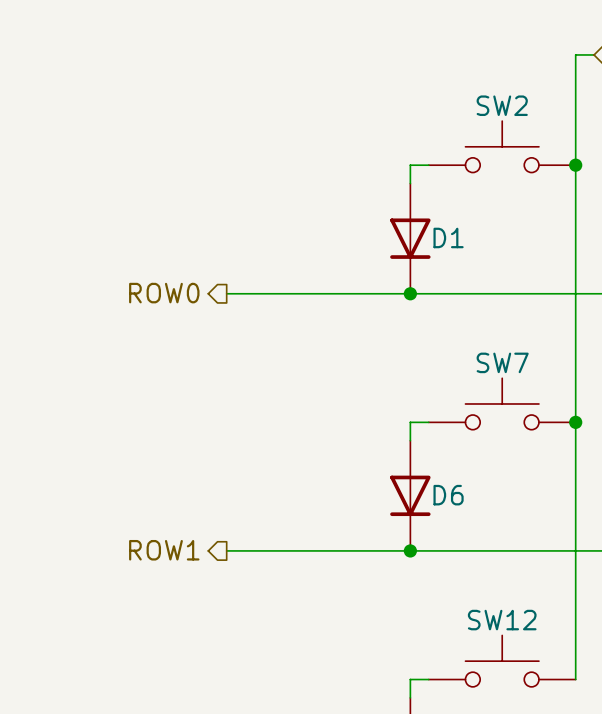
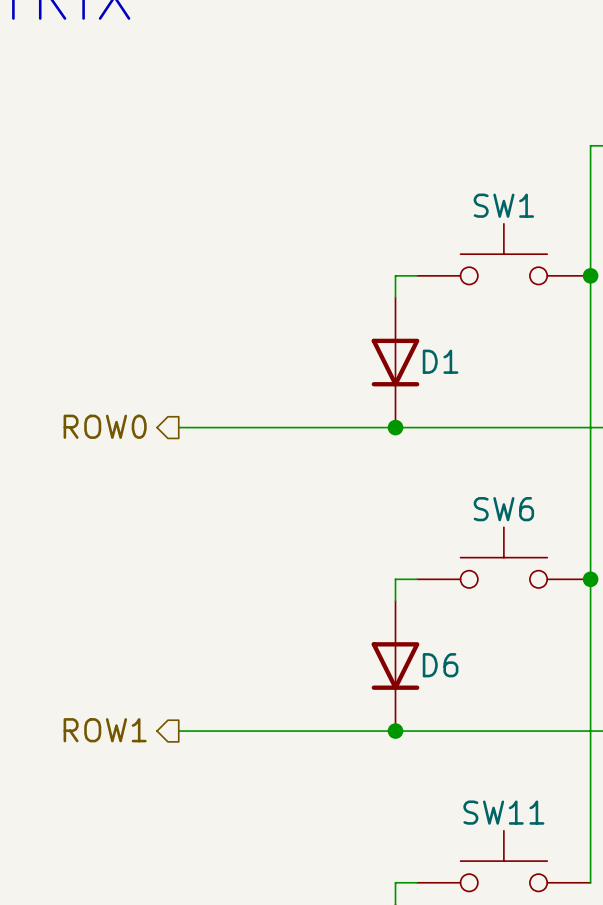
SW2 name: SW2 (502, 105) -> SW1 (503, 205)
SW7 name: SW7 (502, 362) -> SW6 (503, 509)
SW12 name: SW12 (502, 620) -> SW11 (503, 812)

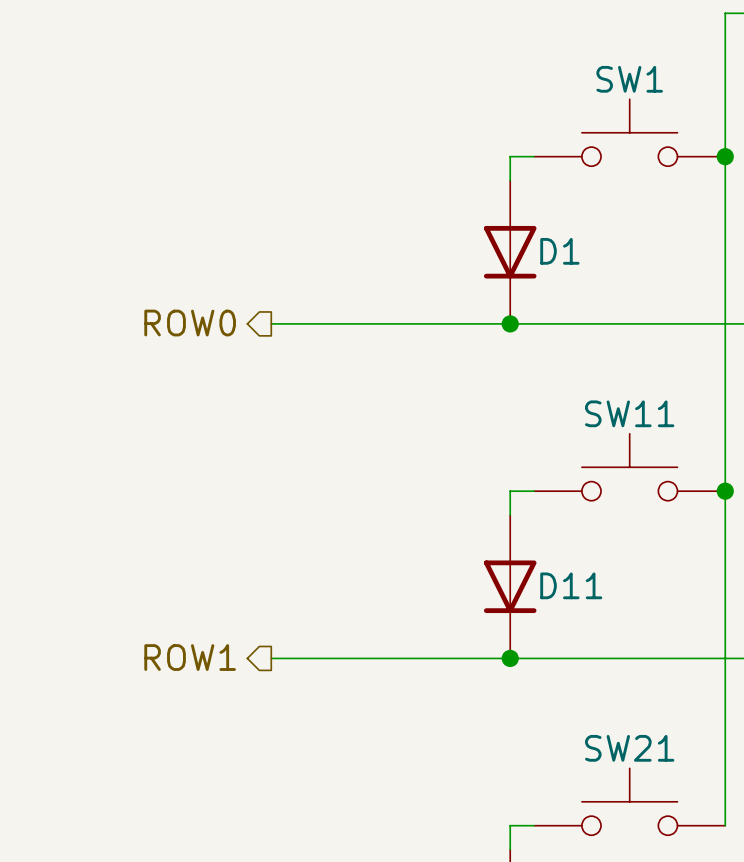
SW6 name: SW6 (503, 509) -> SW11 (629, 413)
D6 name: D6 (440, 665) -> D11 (571, 585)
SW11 name: SW11 (503, 812) -> SW21 (629, 748)

